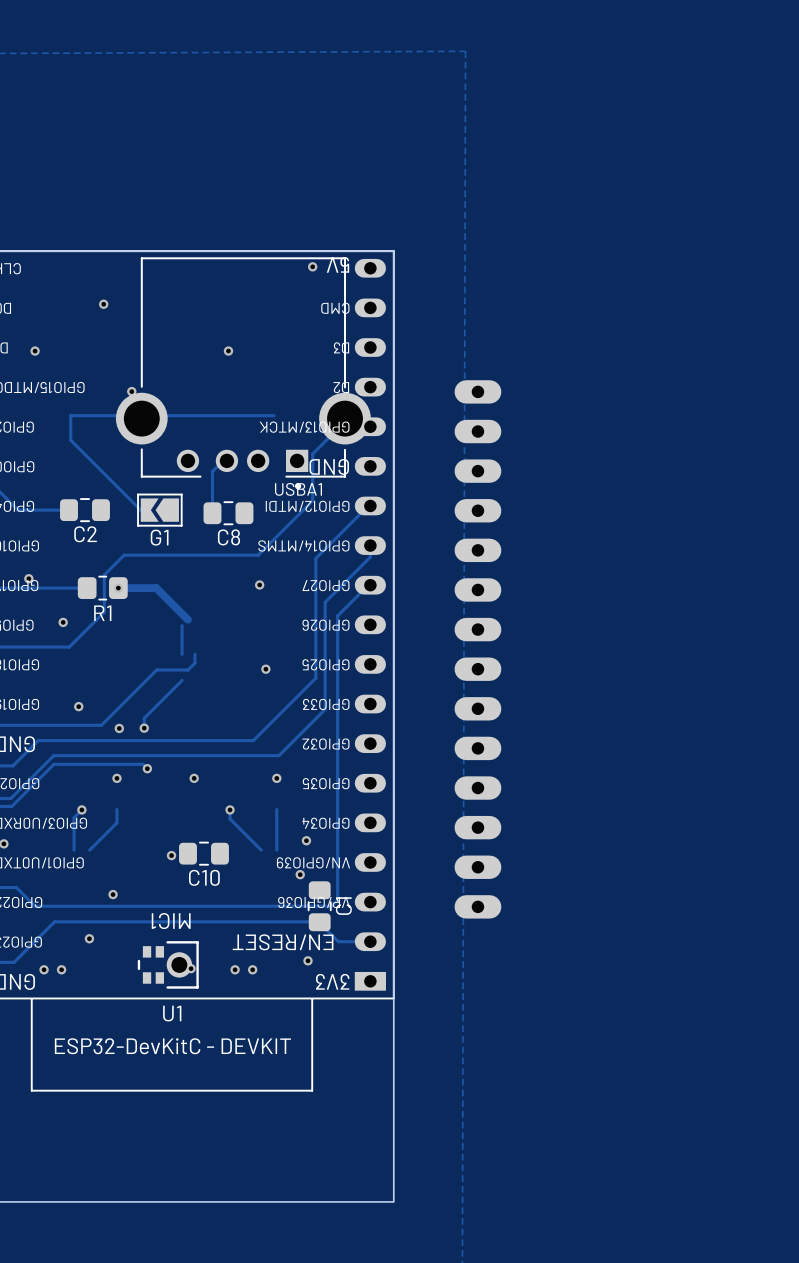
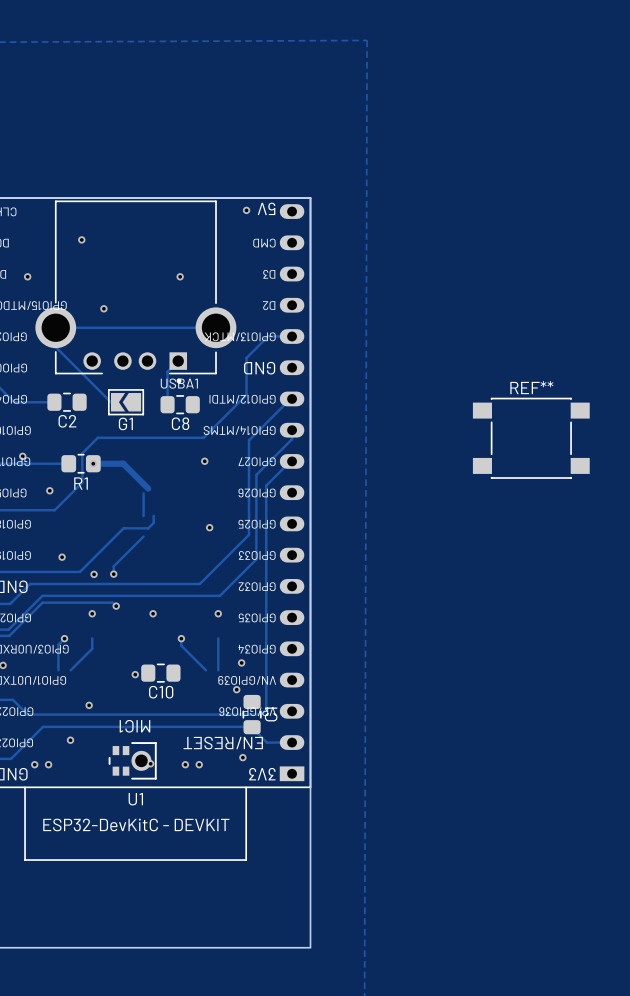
USBA1 position: (243, 373) -> (135, 291)
REF**: none -> (531, 438)
part: (477, 649) -> none

